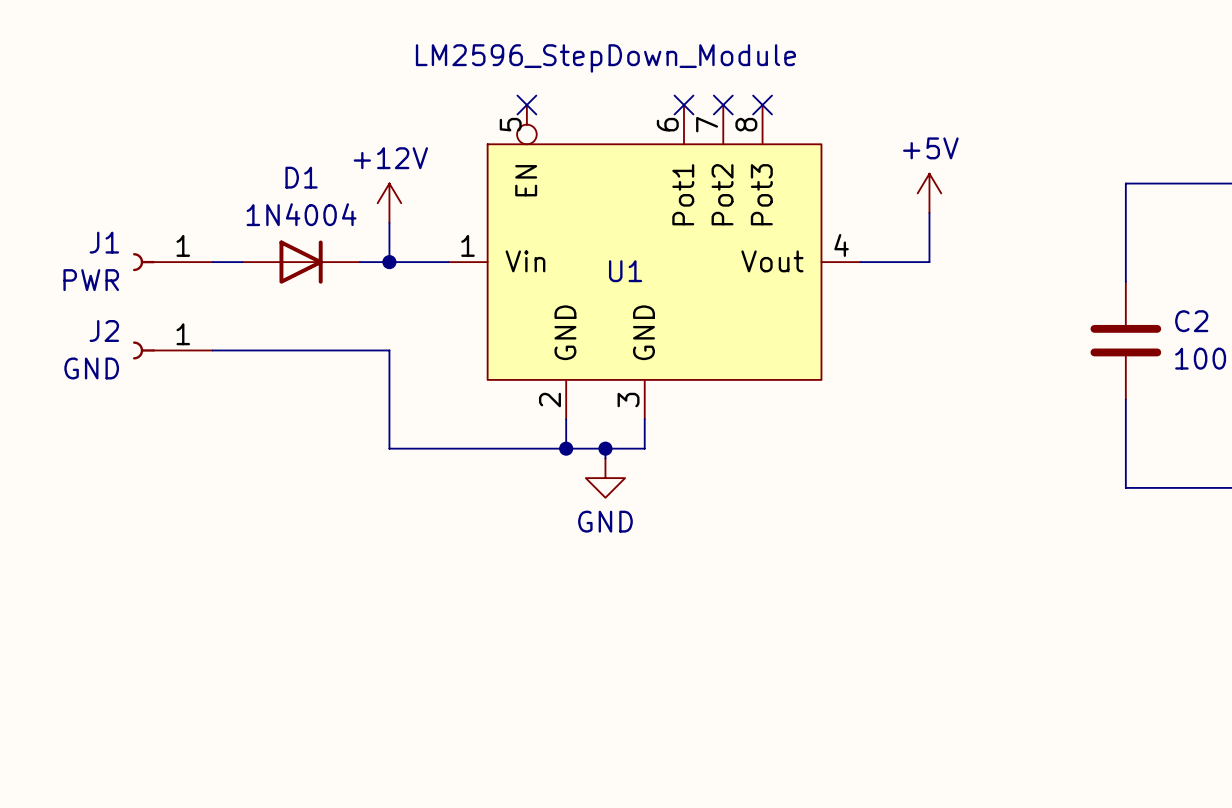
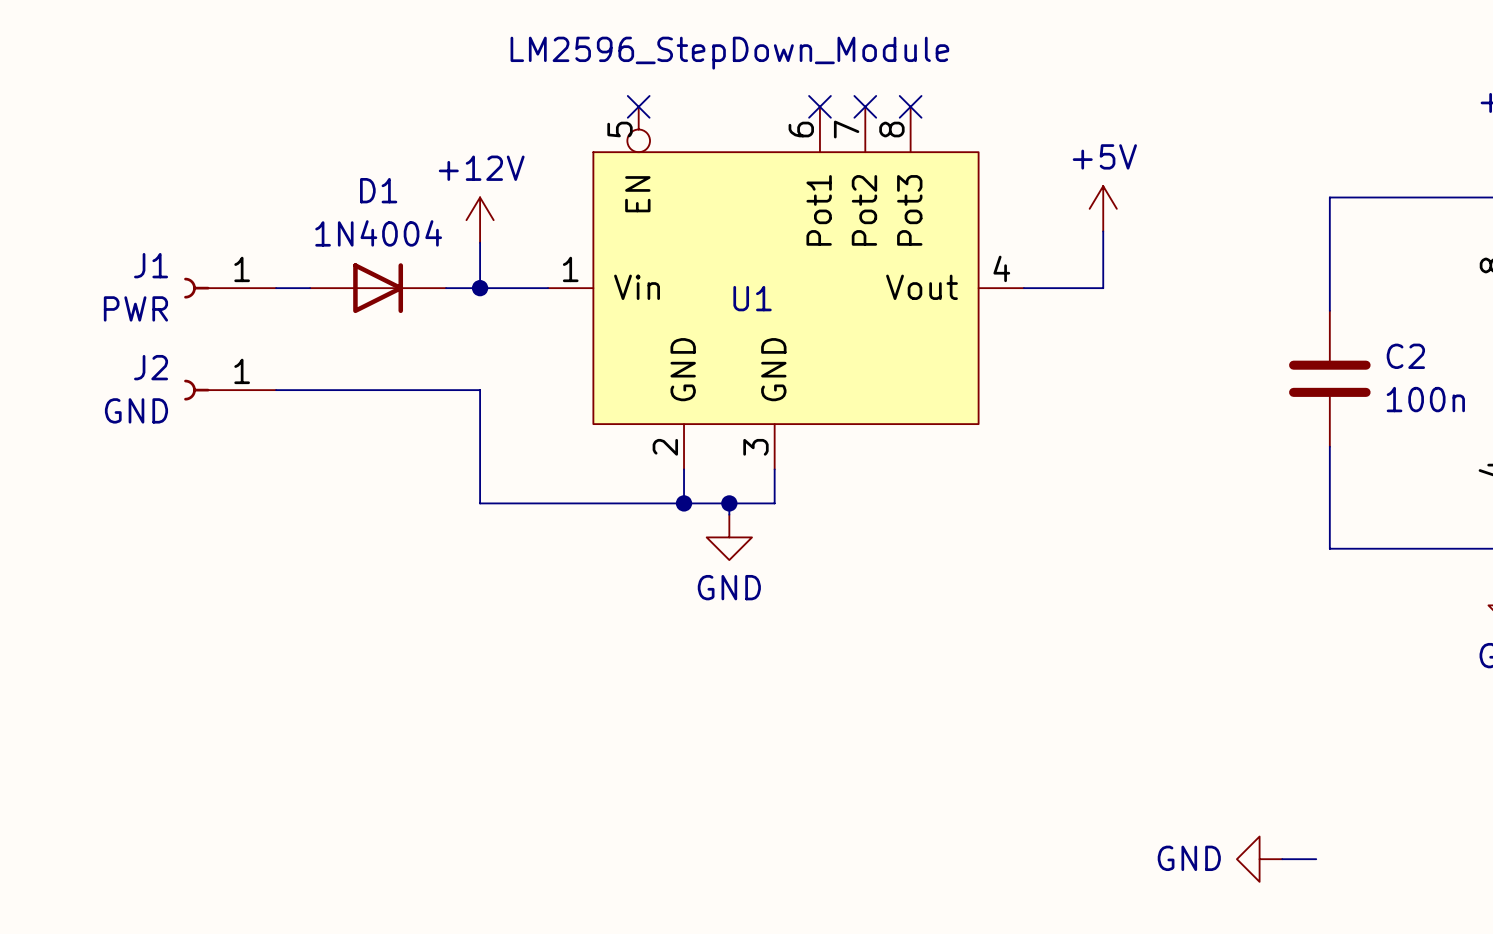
power symbol: none -> GND (1259, 859)
wire: none -> (1282, 859) (1316, 859)

